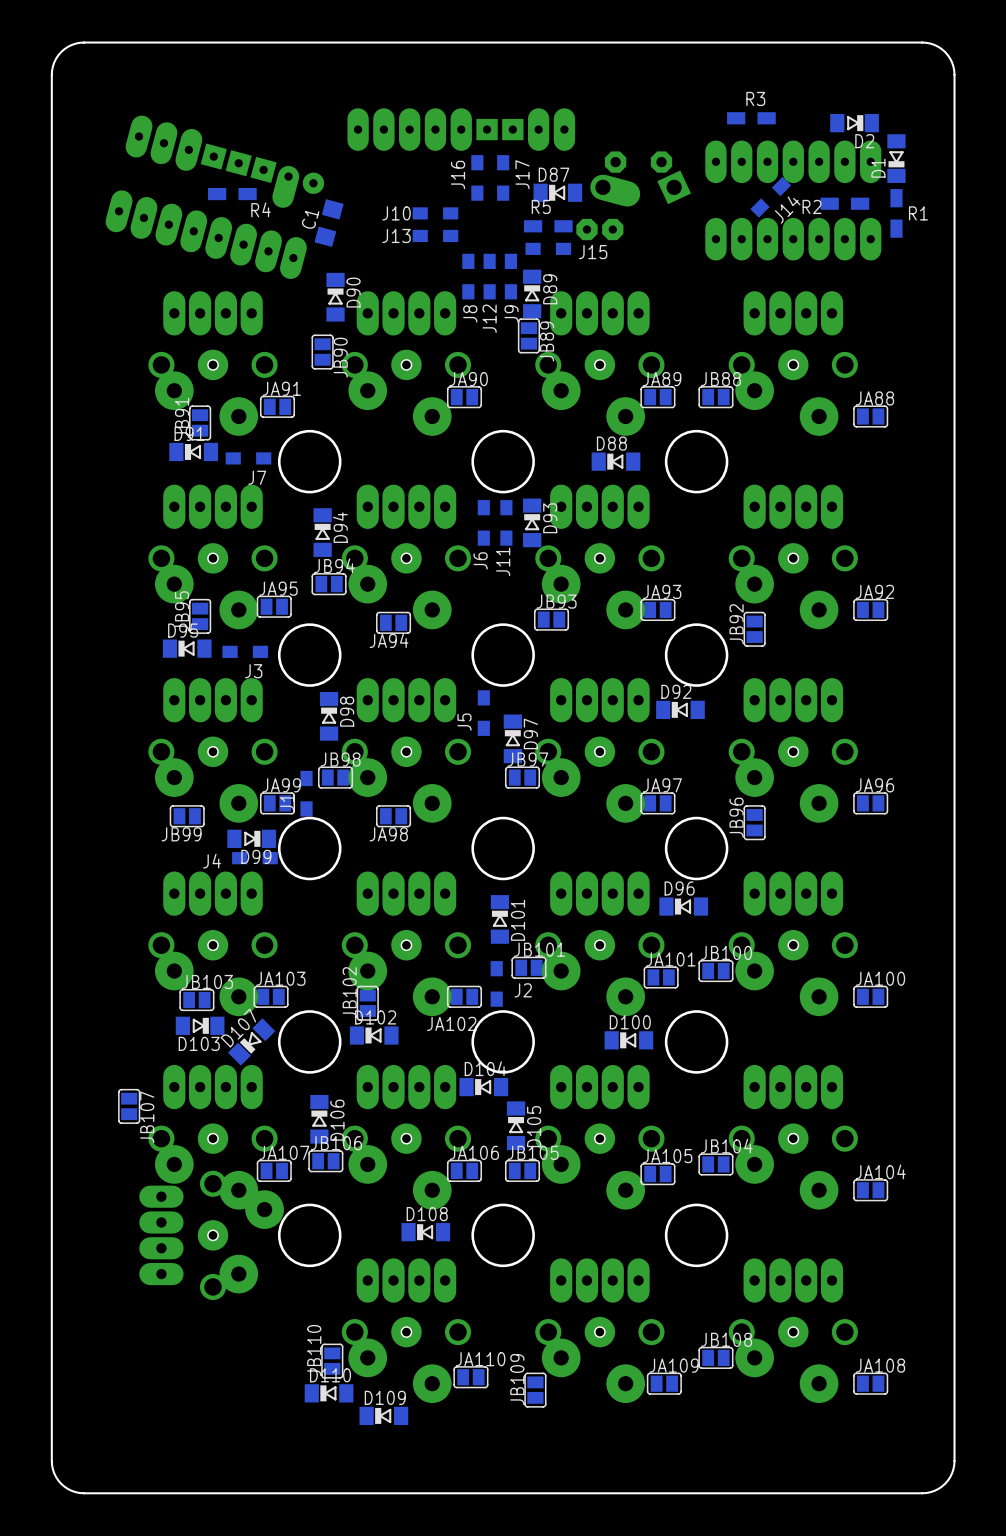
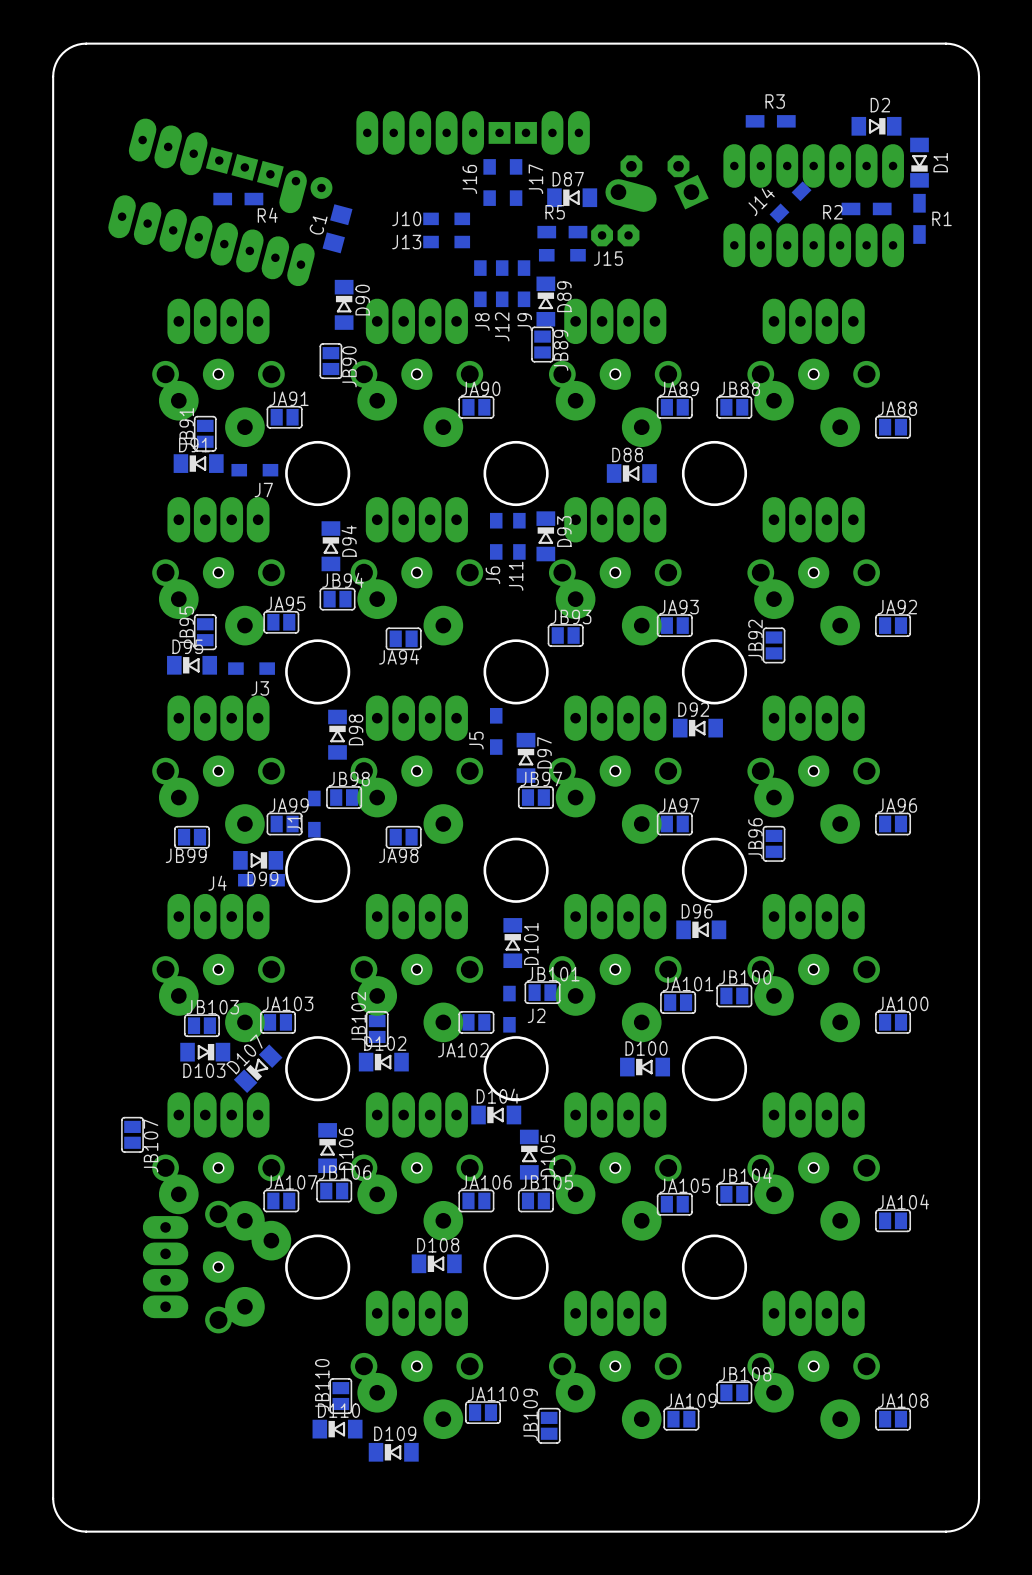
D2 name position: D2 (864, 141) -> D2 (880, 105)
D1 name position: D1 (878, 168) -> D1 (940, 162)
J14 name position: J14 (787, 210) -> J14 (761, 202)

